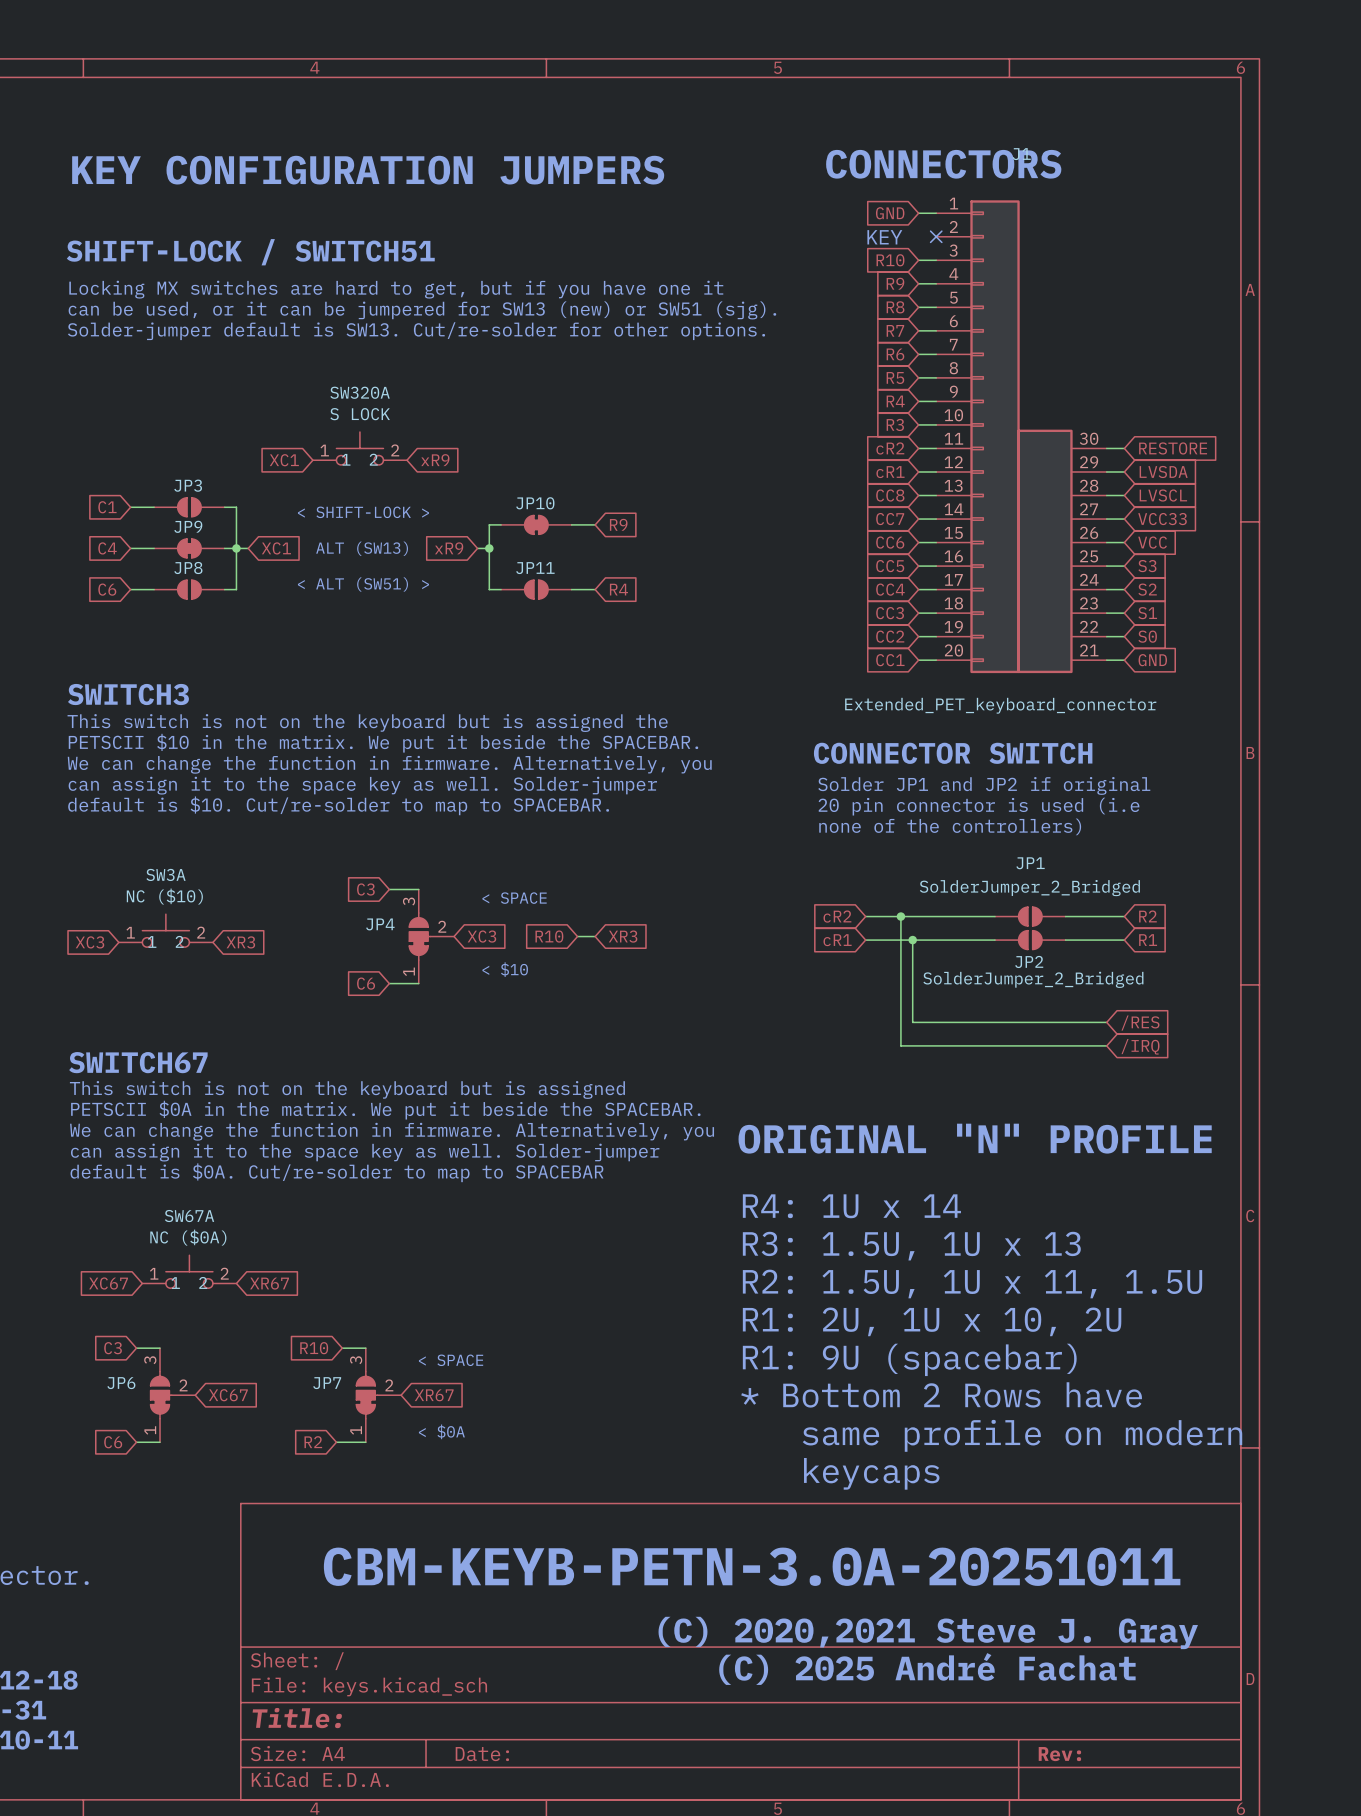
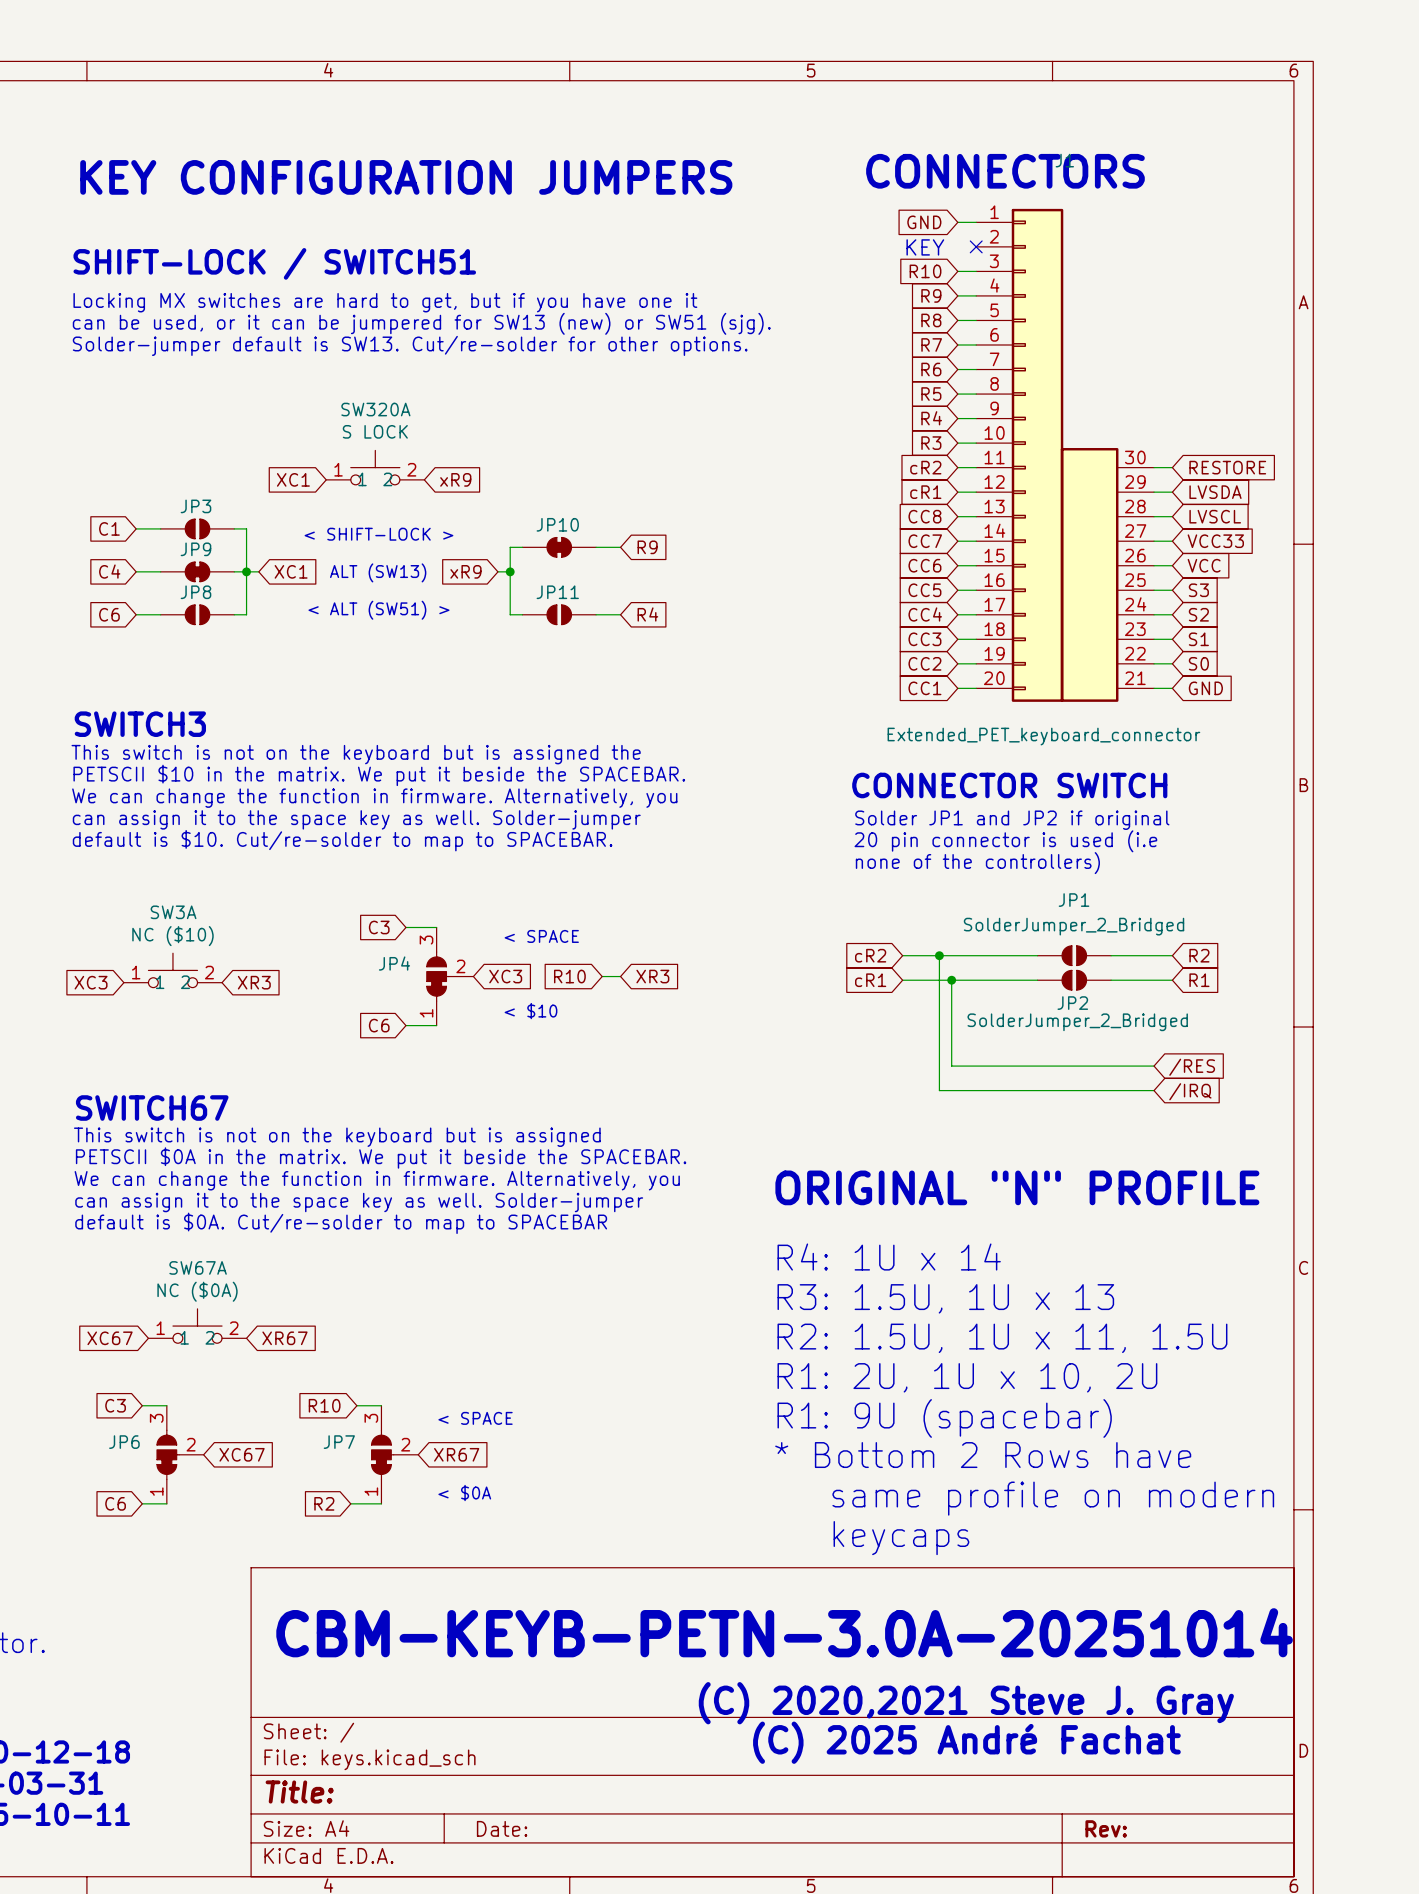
text: CBM-KEYB-PETN-3.0A-20251011 (752, 1566) -> CBM-KEYB-PETN-3.0A-20251014 (784, 1632)

